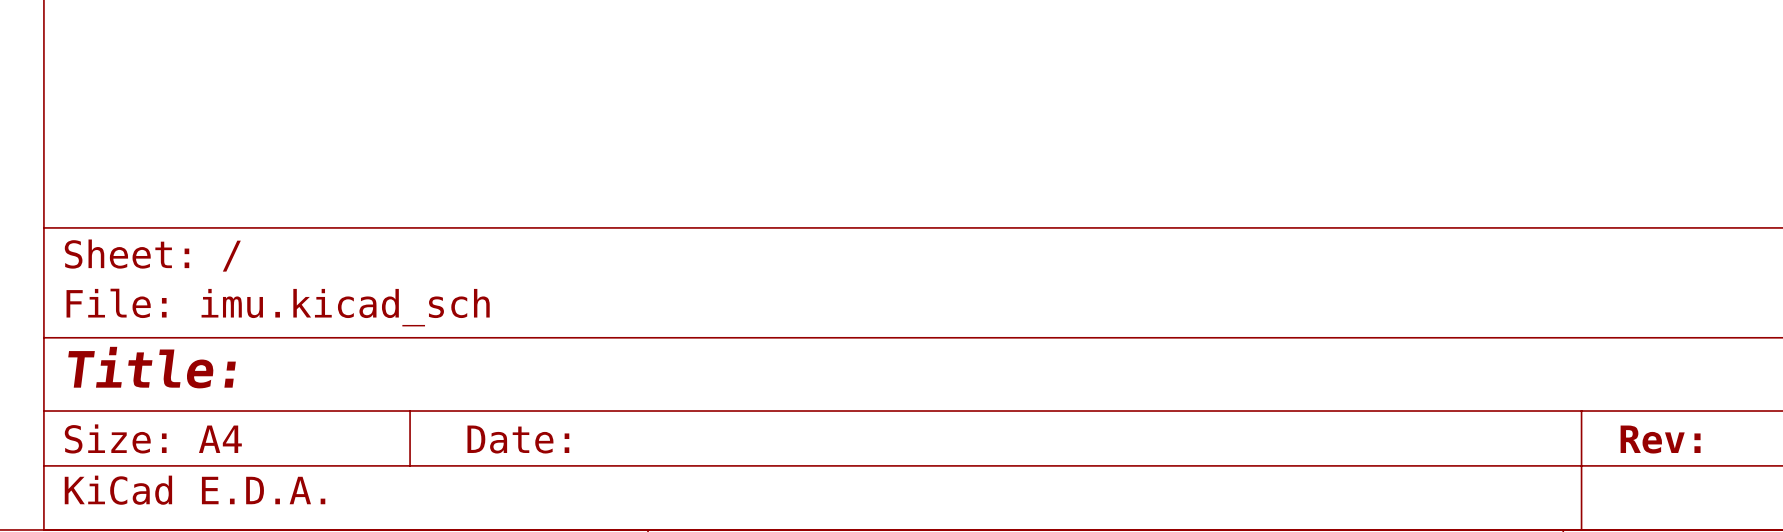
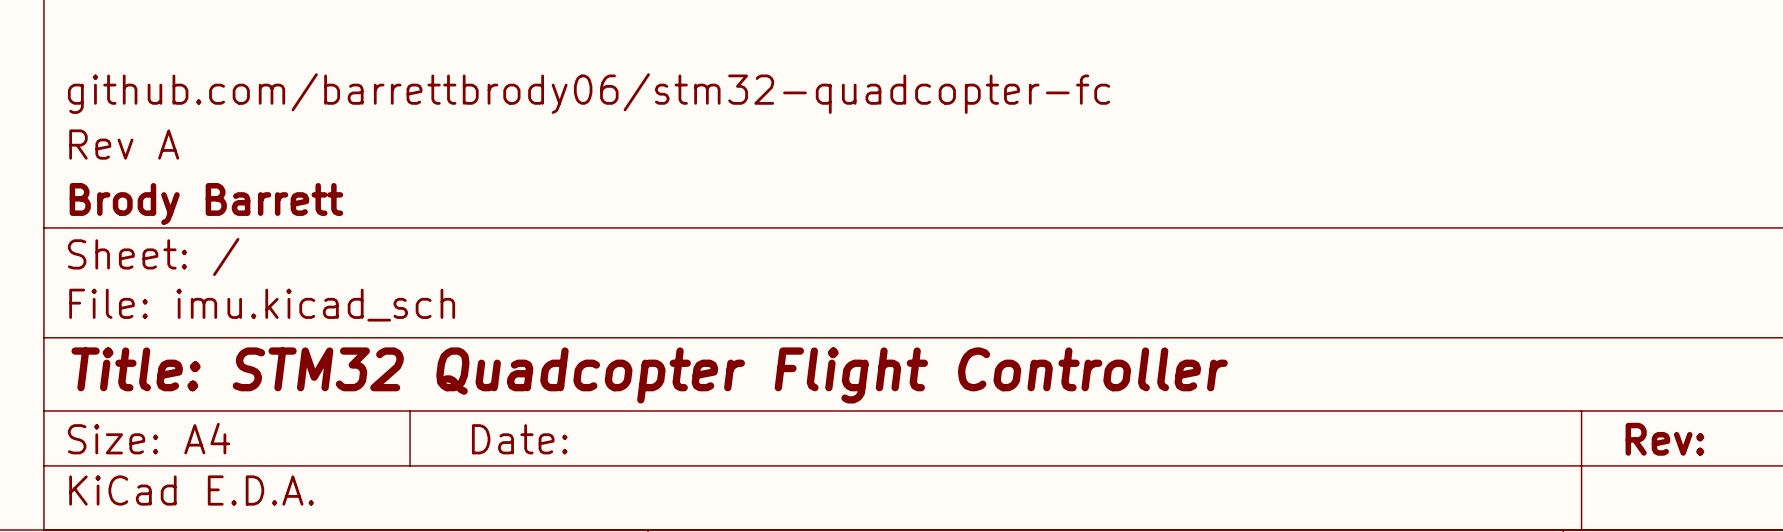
title block: none -> github.com/barrettbrody06/stm32-quadcopter-fc (589, 93)
title block: none -> Rev A (124, 144)
title block: none -> Brody Barrett (206, 204)
title block: Title: (152, 367) -> Title: STM32 Quadcopter Flight Controller (649, 375)

